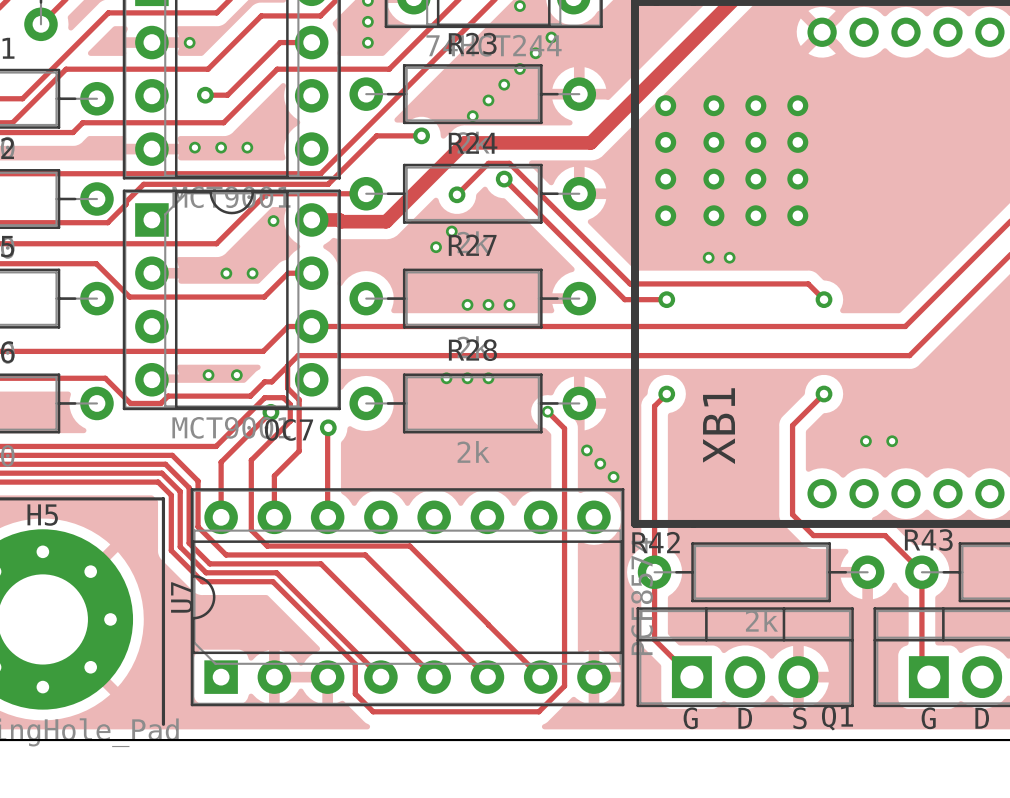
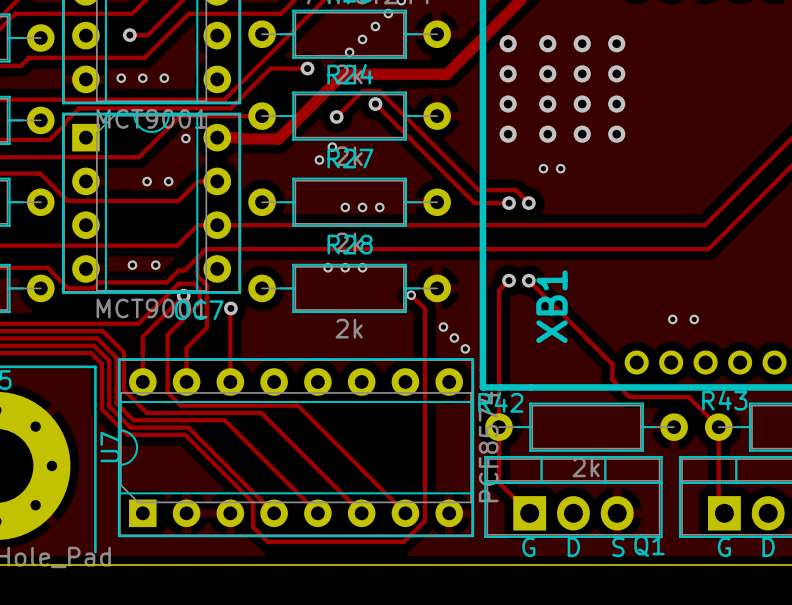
track: (675, 283) (808, 283) (824, 299) -> (515, 190) (528, 203)
via: none -> (528, 203)
via: (824, 299) -> none
via: none -> (528, 280)
track: (824, 394) (792, 425) (792, 495) -> (528, 280) (612, 364)
via: (824, 394) -> none

